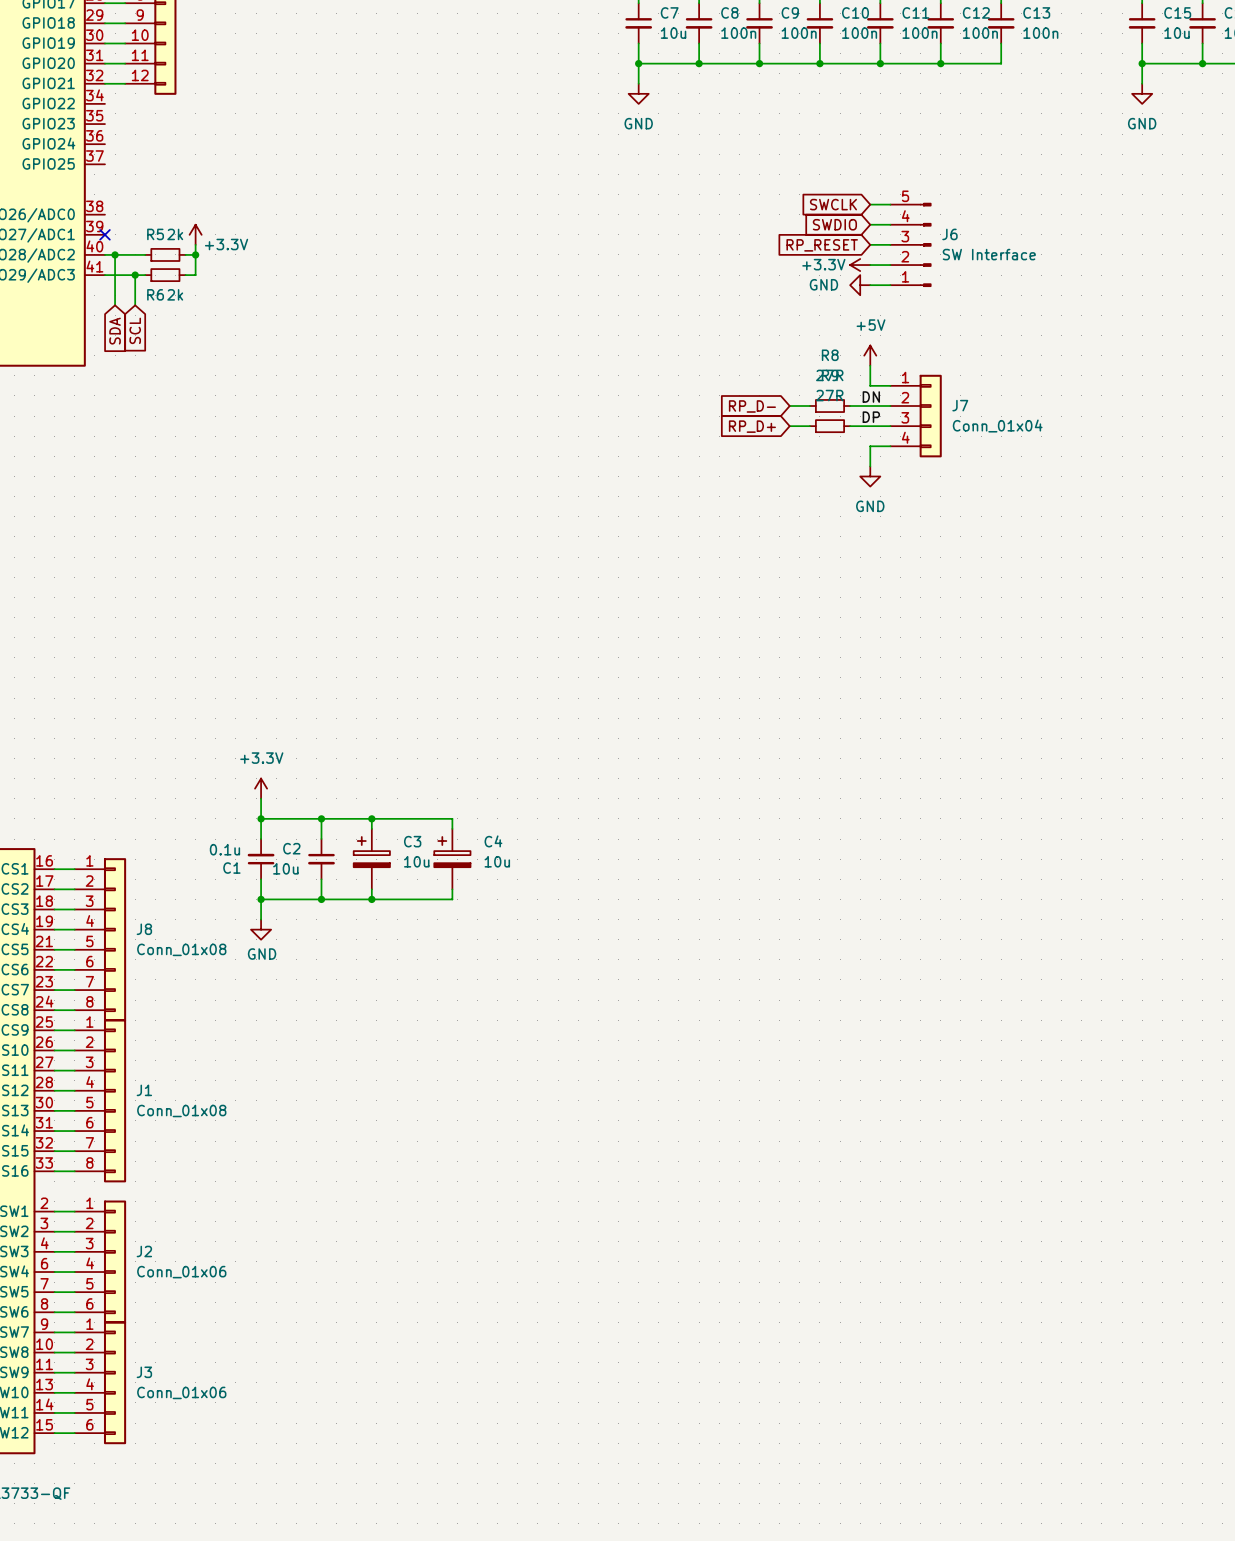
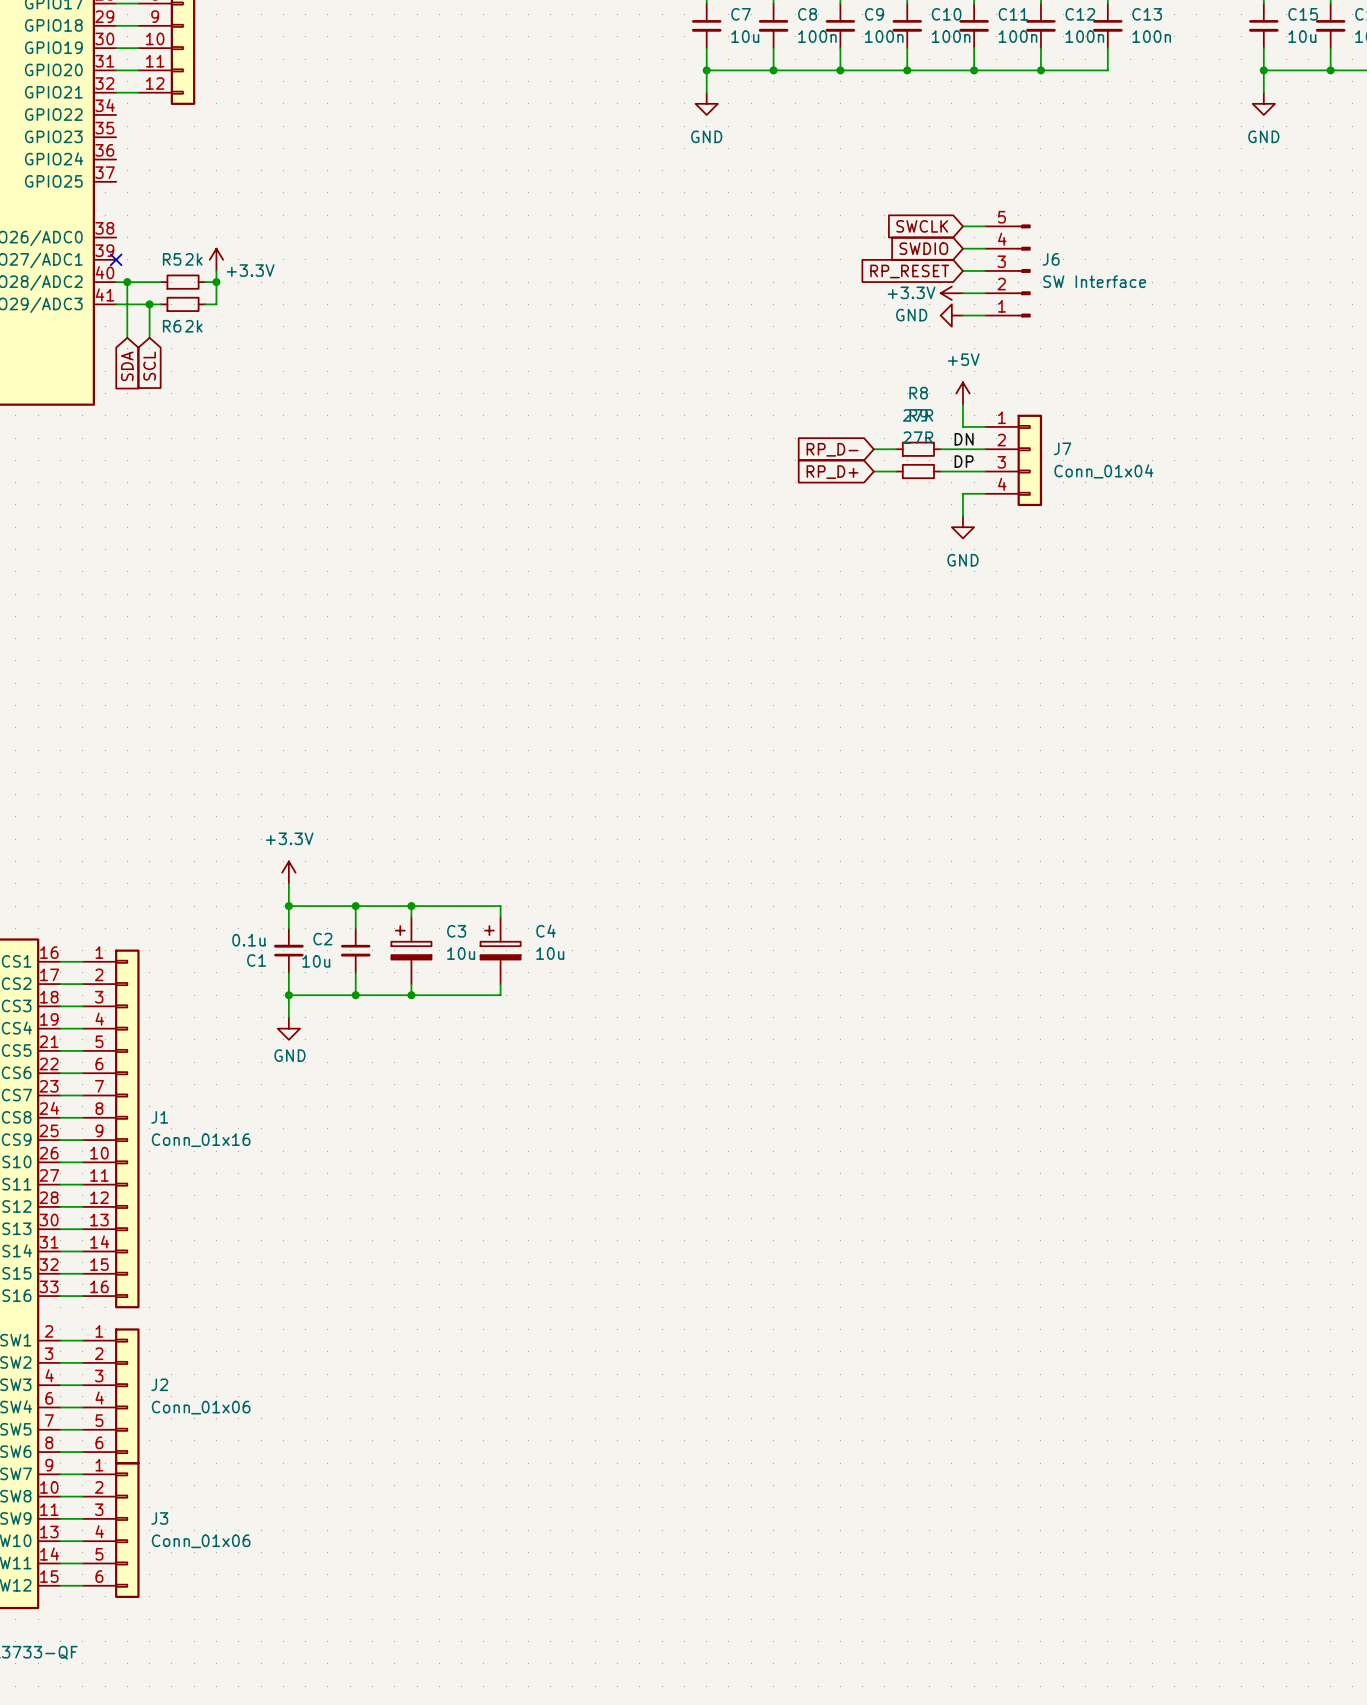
J8: Conn_01x08 (100, 939) -> none
J1 symbol: [74, 1019, 127, 1183] -> [82, 949, 140, 1309]
J1 value: Conn_01x08 (181, 1110) -> Conn_01x16 (201, 1140)

